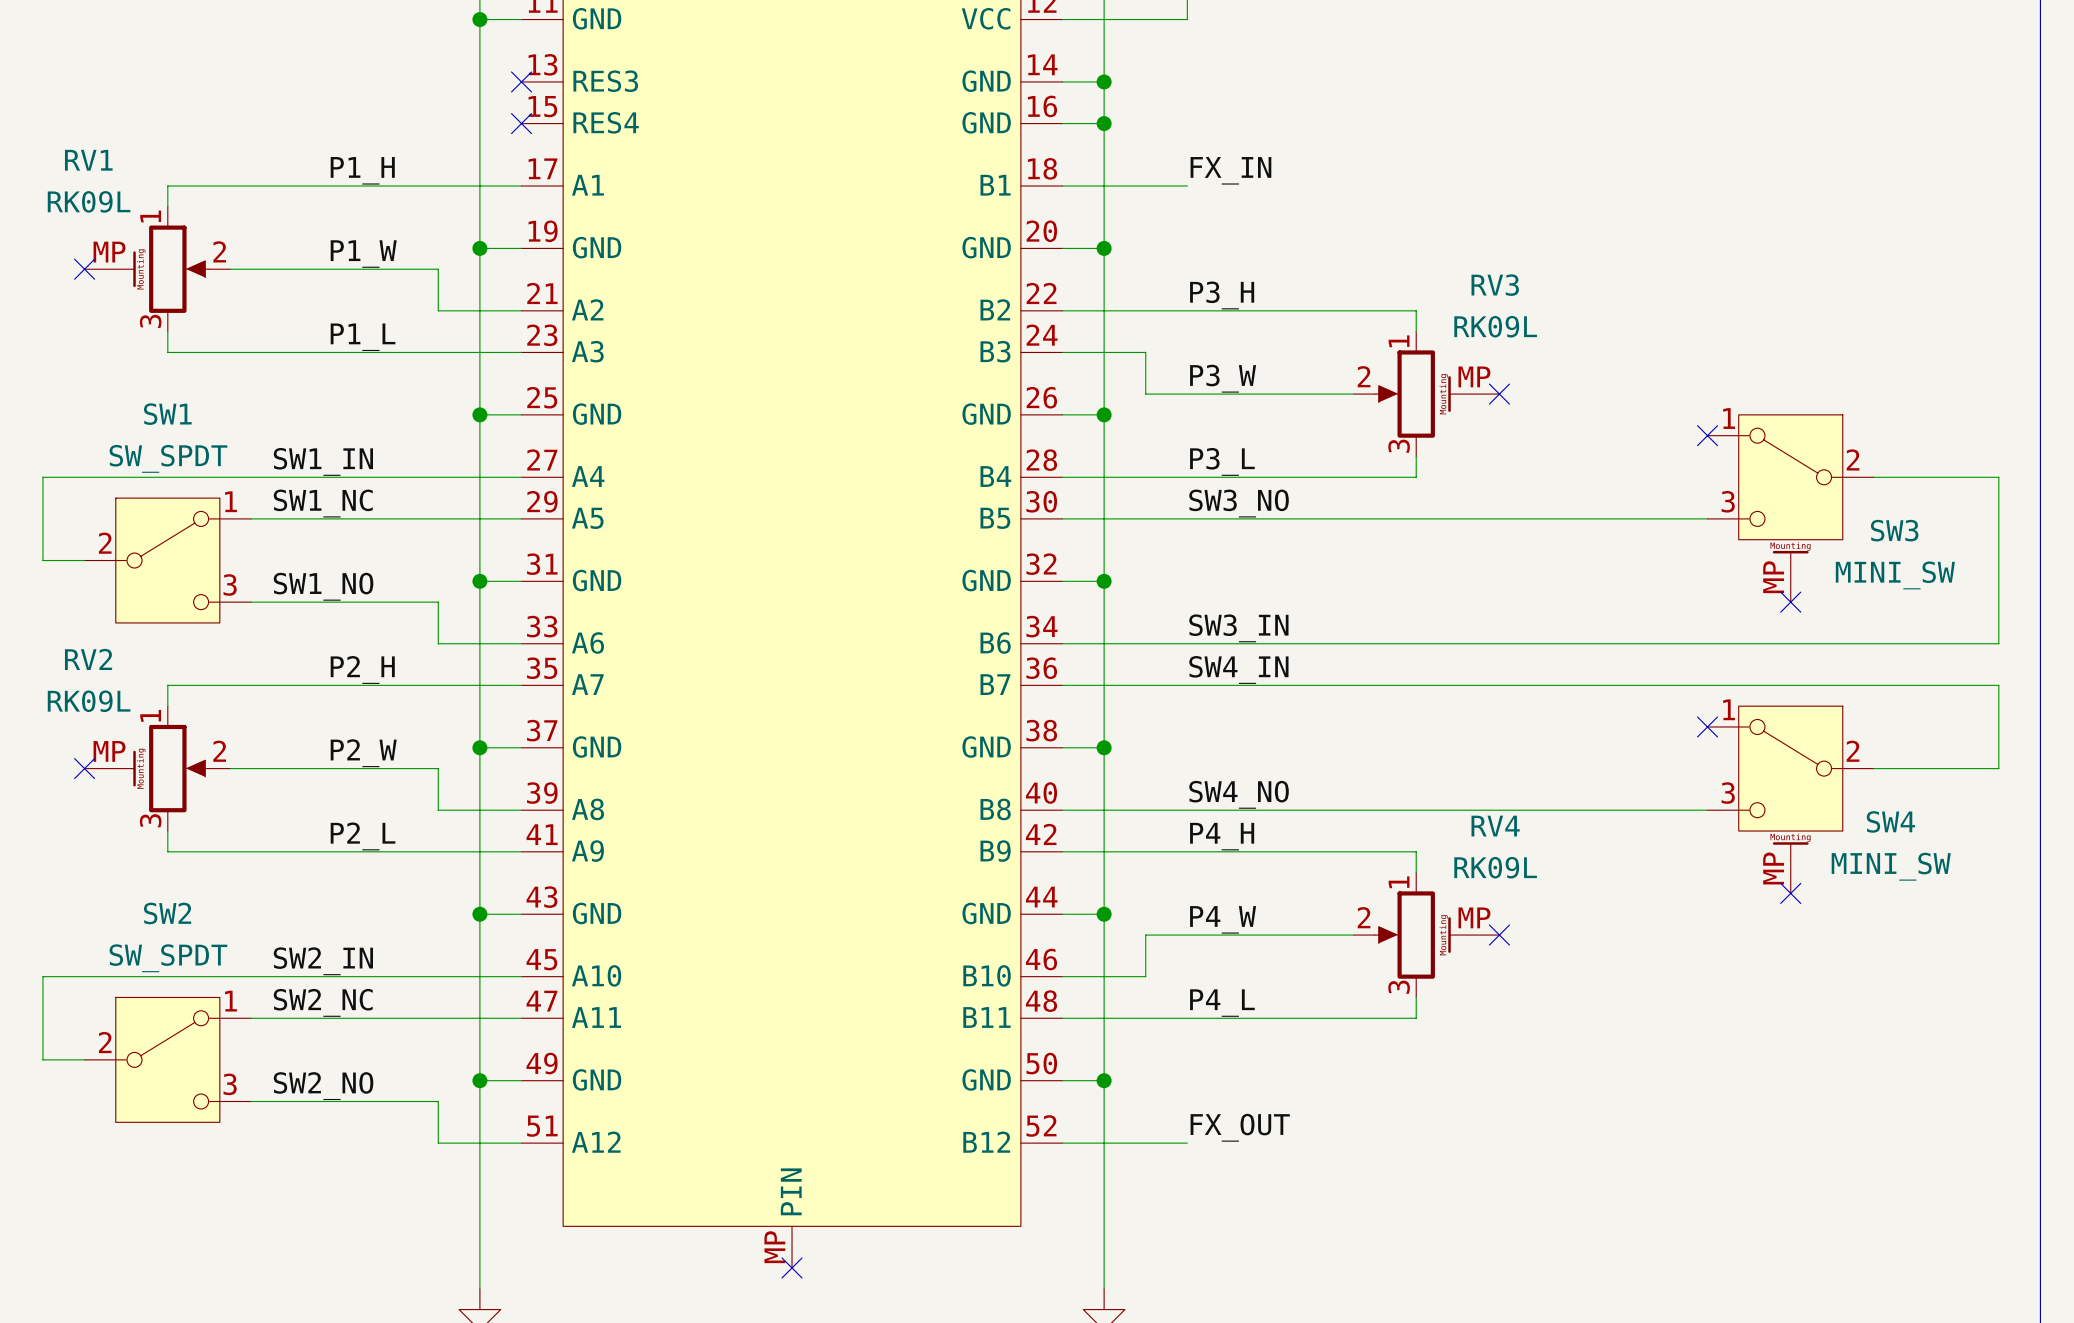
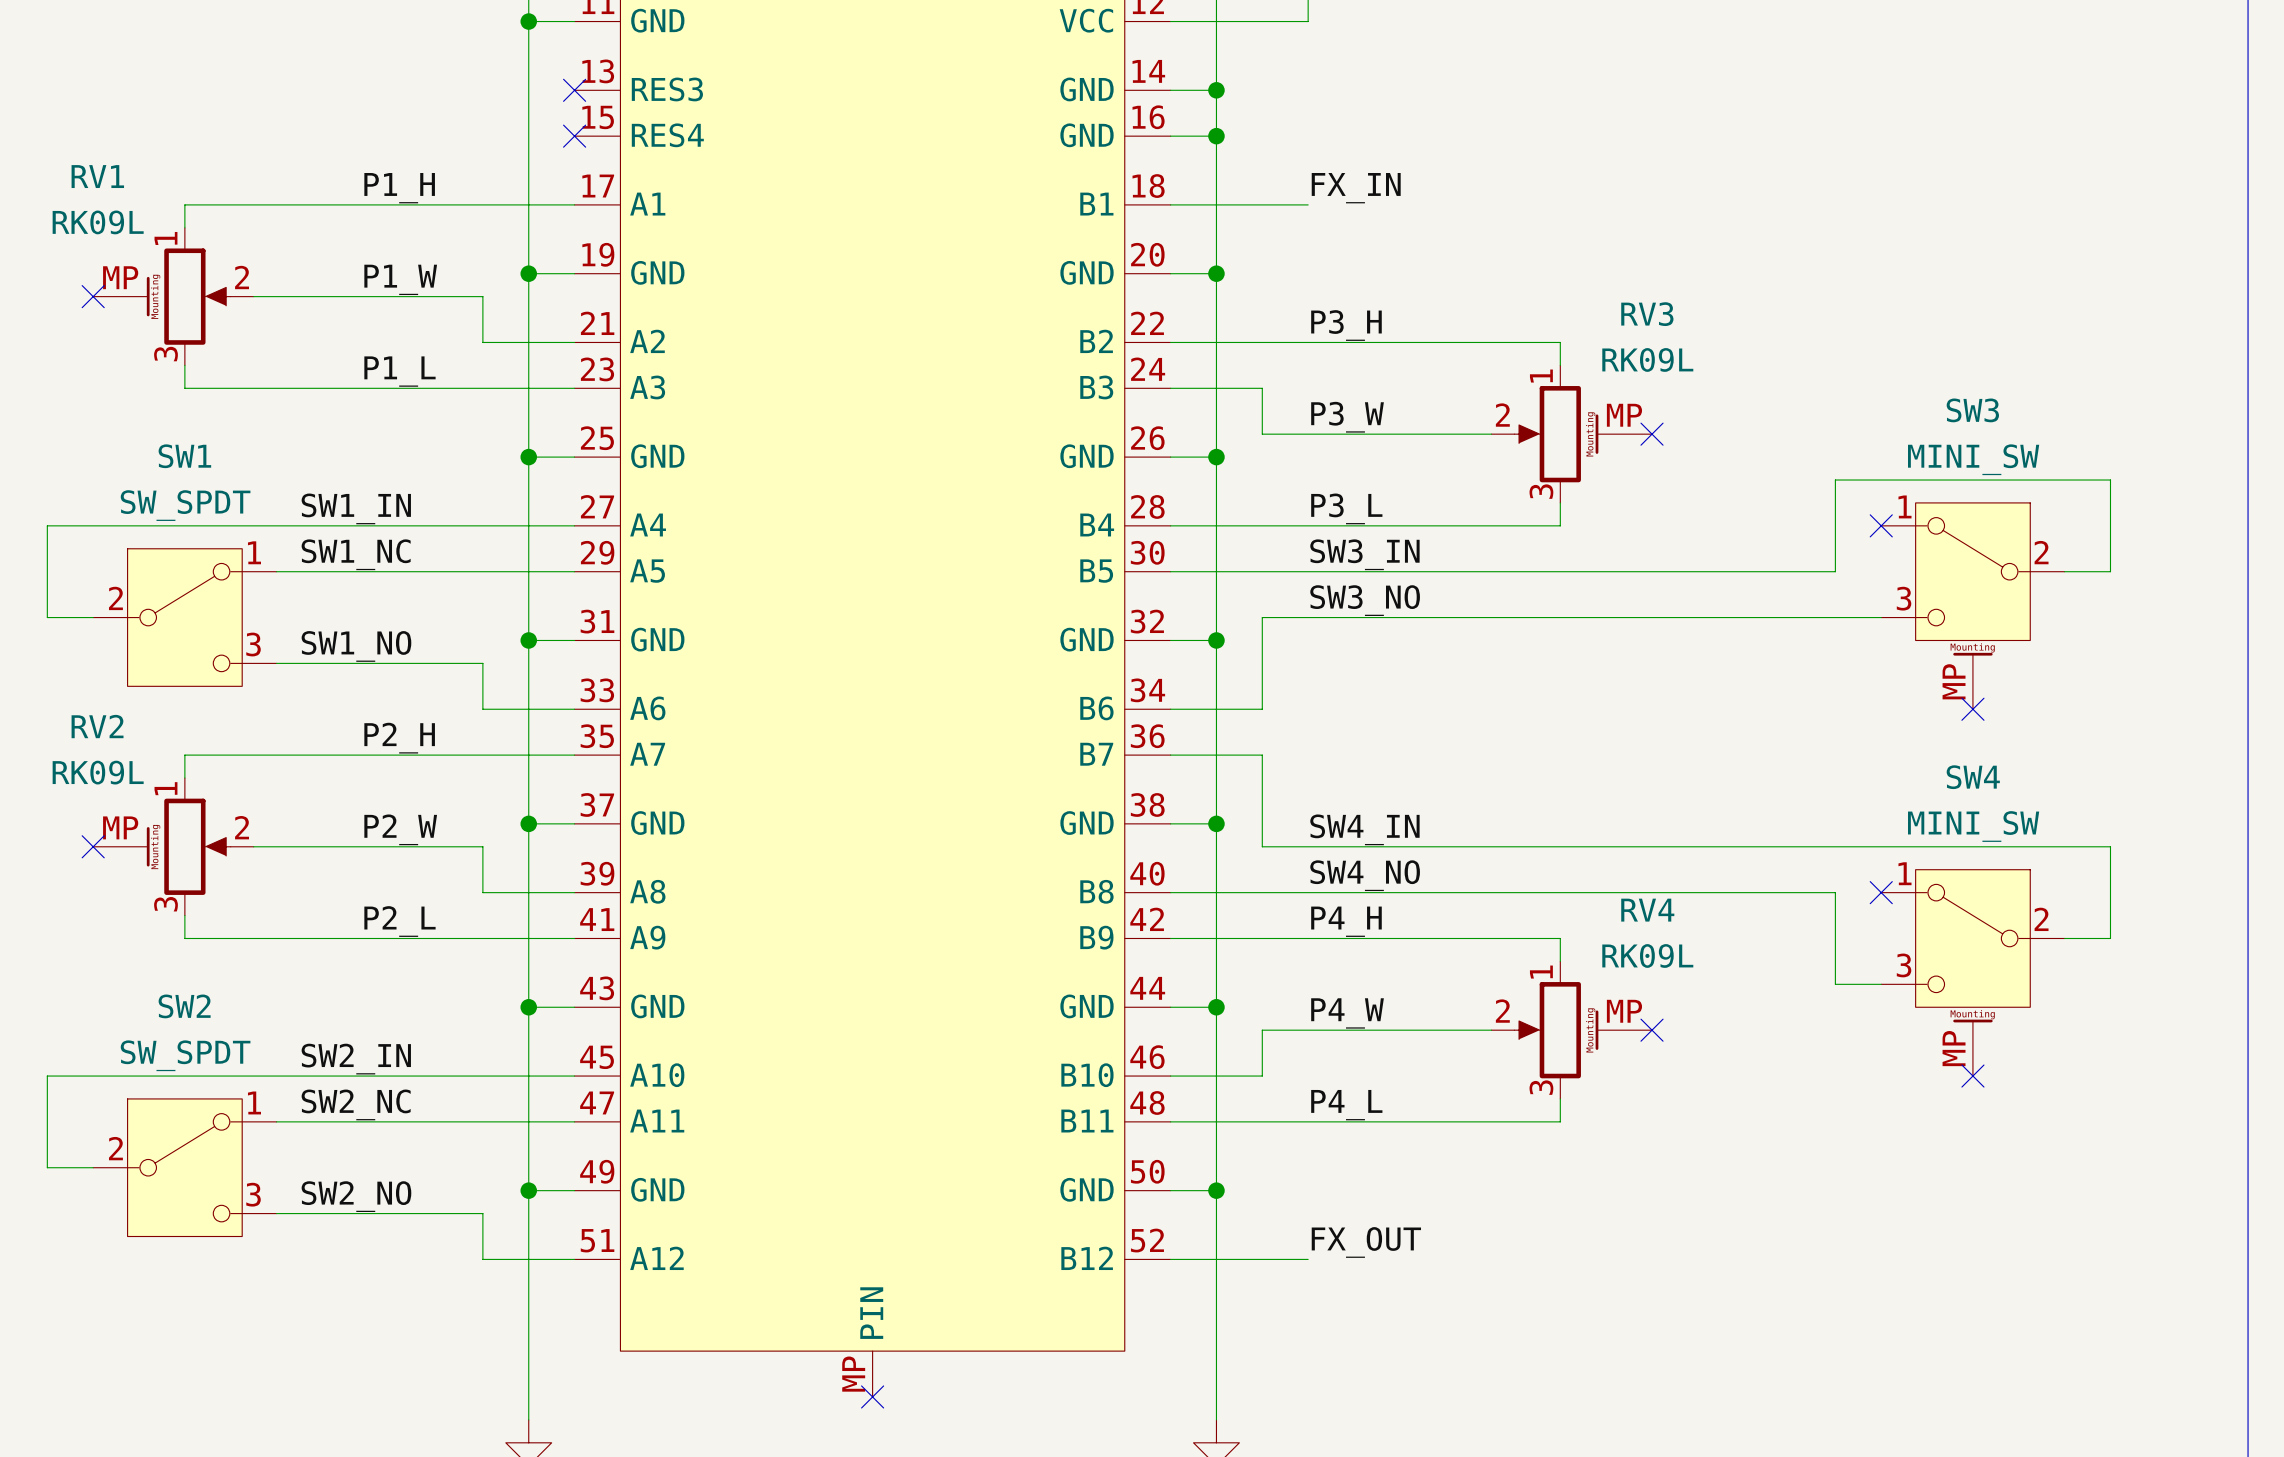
no-connect mark position: (1707, 435) -> (1881, 525)
wire: (1873, 477) (1998, 477) (1998, 643) (1145, 643) -> (1881, 617) (1262, 617) (1262, 709)
label: SW3_NO (1239, 503) -> SW3_IN (1364, 554)
SW3 position: (1790, 508) -> (1972, 606)
wire: (1665, 518) (1707, 518) -> (1835, 571) (1835, 480) (2110, 480) (2110, 571) (2064, 571)
SW3 name position: SW3 (1894, 530) -> SW3 (1972, 410)
label: none -> SW3_NO (1365, 600)
SW3 value position: MINI_SW (1895, 575) -> MINI_SW (1973, 459)
no-connect mark position: (1790, 602) -> (1972, 709)
label: SW3_IN (1238, 628) -> none
label position: SW4_IN (1238, 669) -> SW4_IN (1364, 829)
wire: (1145, 685) (1998, 685) (1998, 768) (1915, 768) -> (1262, 755) (1262, 846) (2064, 846)
no-connect mark: (1707, 726) -> none
wire: none -> (2110, 846) (2110, 938) (2064, 938)
SW4 position: (1790, 799) -> (1972, 972)
wire: (1665, 810) (1707, 810) -> (1835, 892) (1835, 984) (1881, 984)
no-connect mark: none -> (1881, 892)
SW4 name position: SW4 (1890, 821) -> SW4 (1973, 777)
SW4 value position: MINI_SW (1891, 866) -> MINI_SW (1973, 826)
no-connect mark: (1790, 893) -> none
no-connect mark: none -> (1972, 1076)

